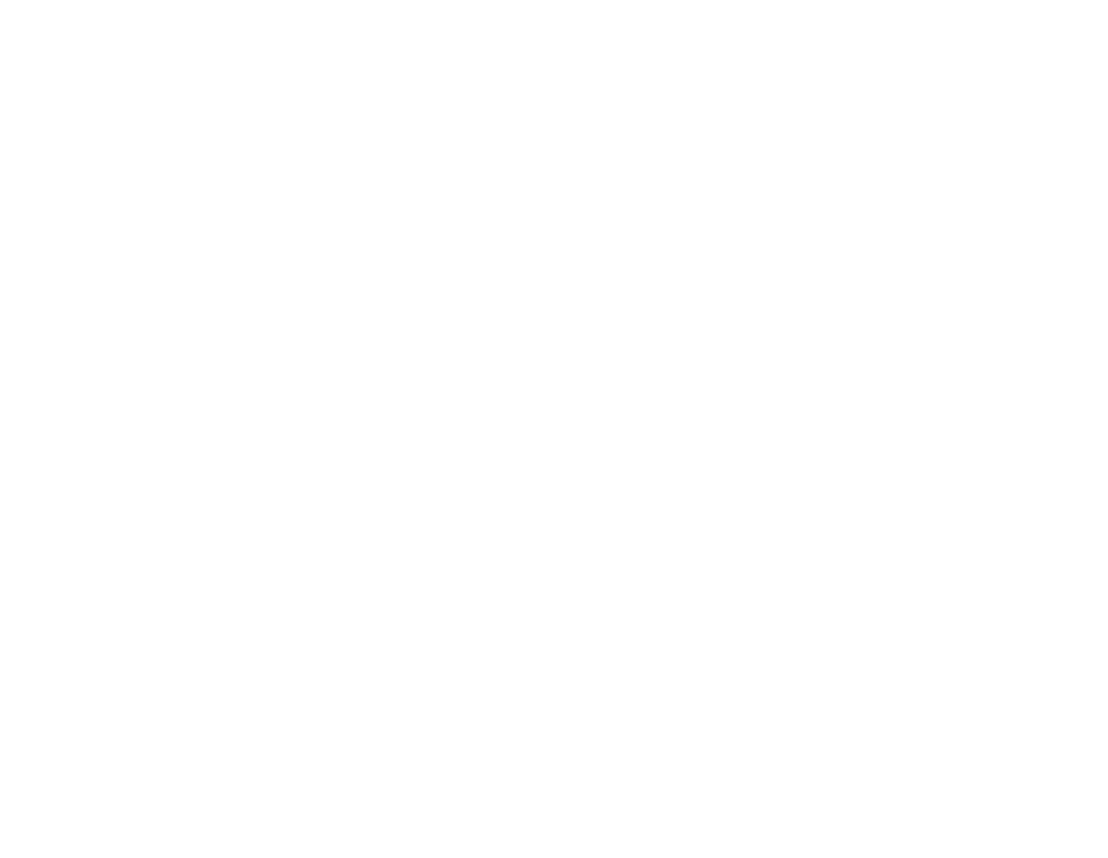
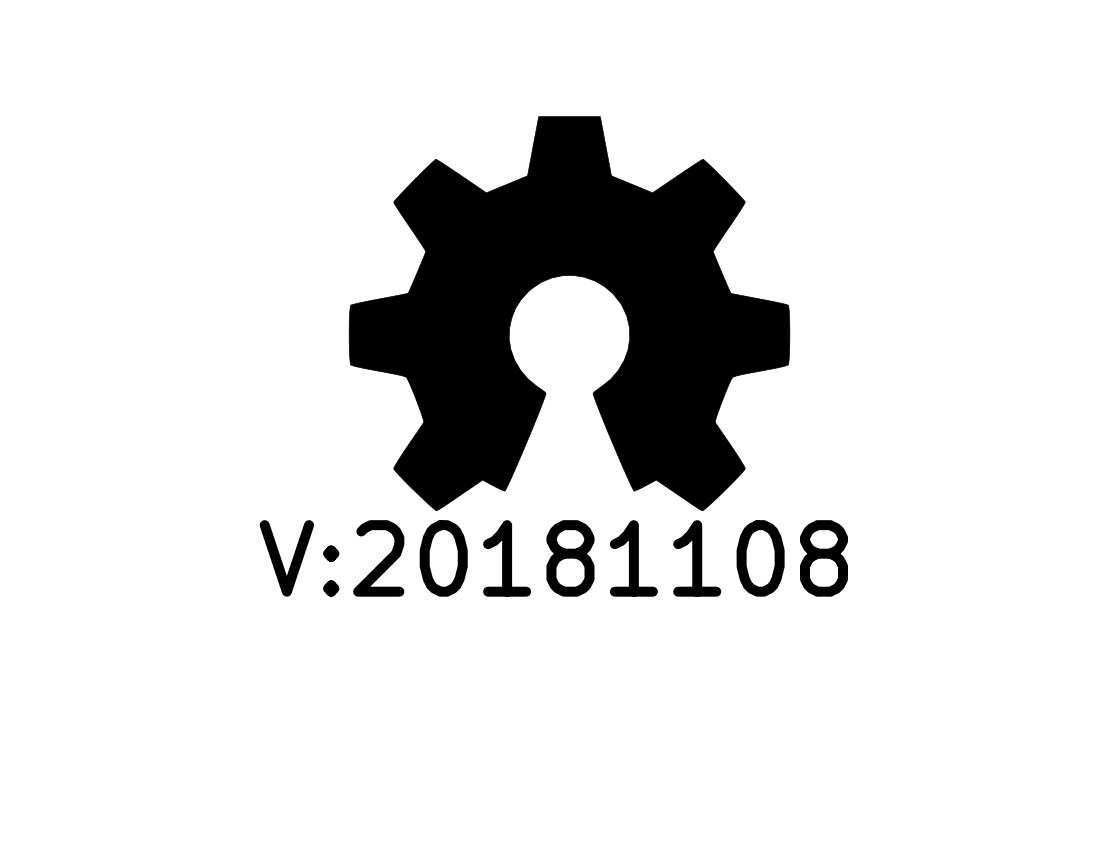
drawing: none -> [348, 116, 791, 512]

